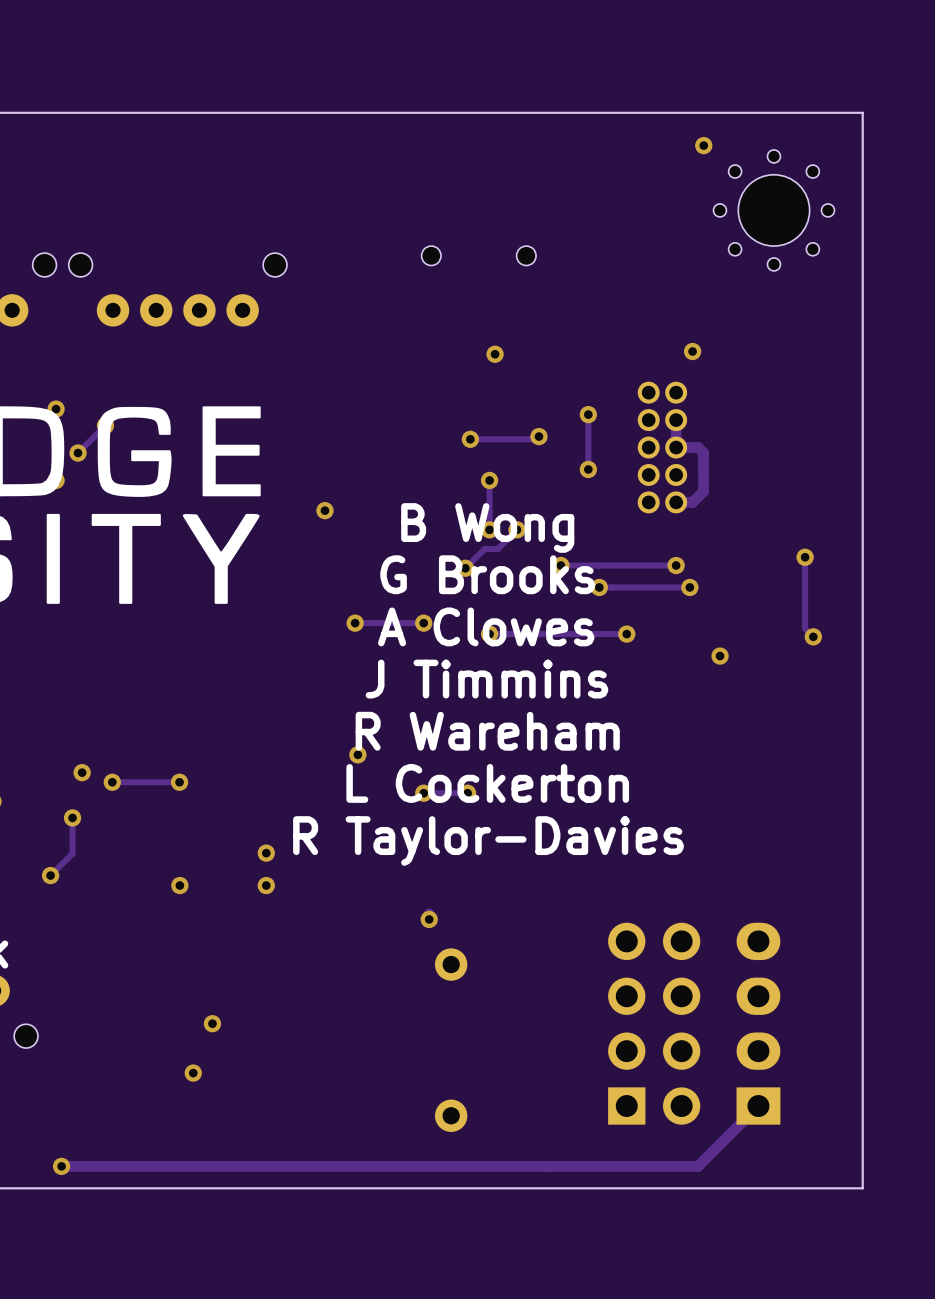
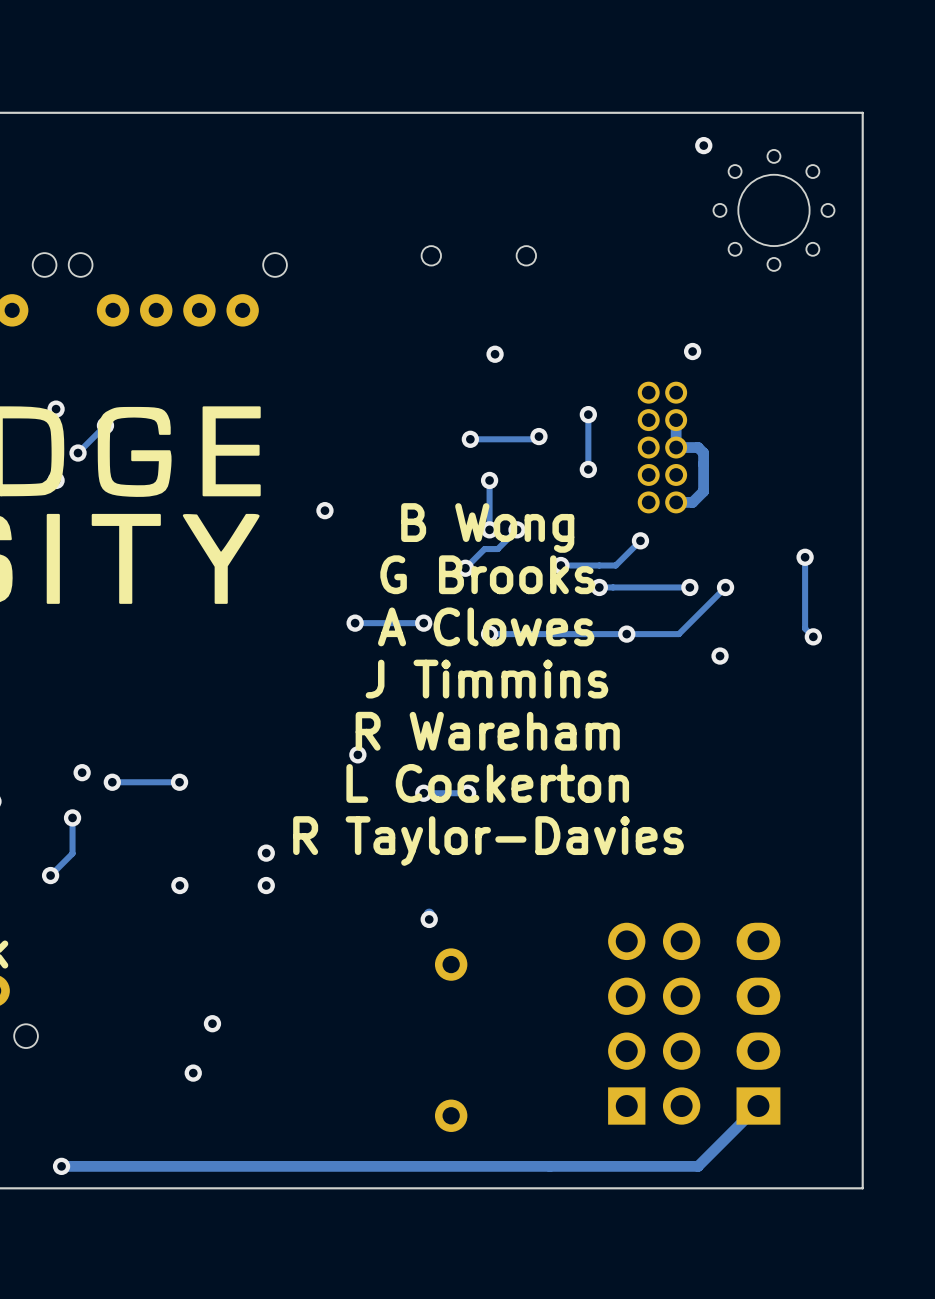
via: none -> (640, 540)
track: (676, 565) (615, 565) -> (640, 540) (615, 565)
via: (676, 565) -> none
track: none -> (725, 587) (678, 634) (626, 634)
via: none -> (725, 587)

